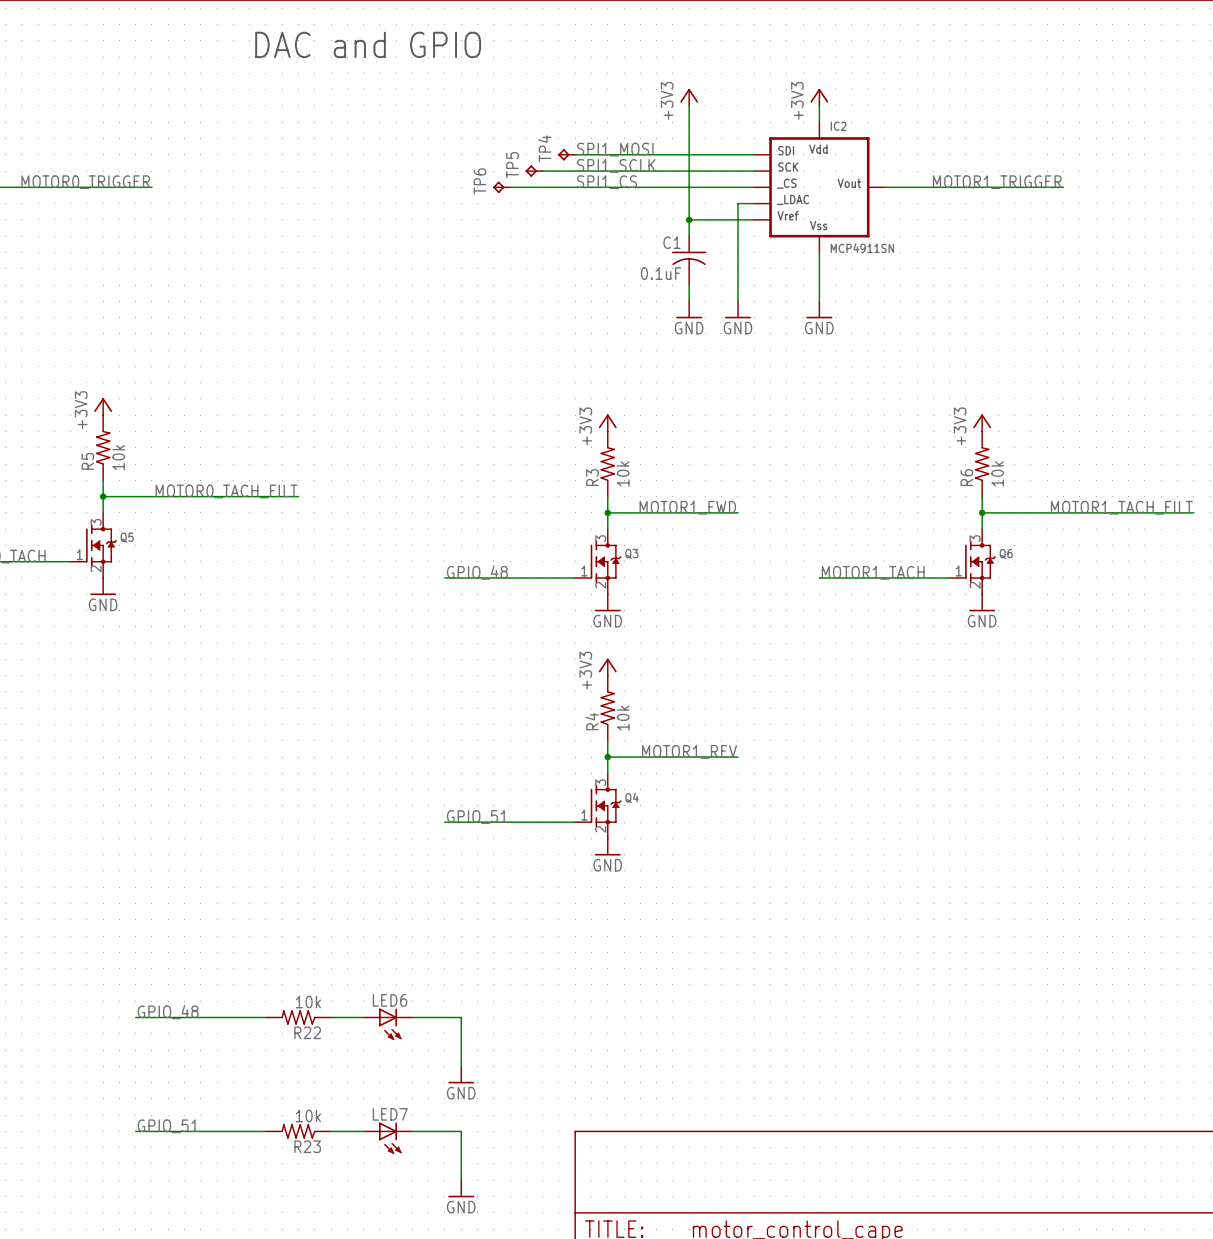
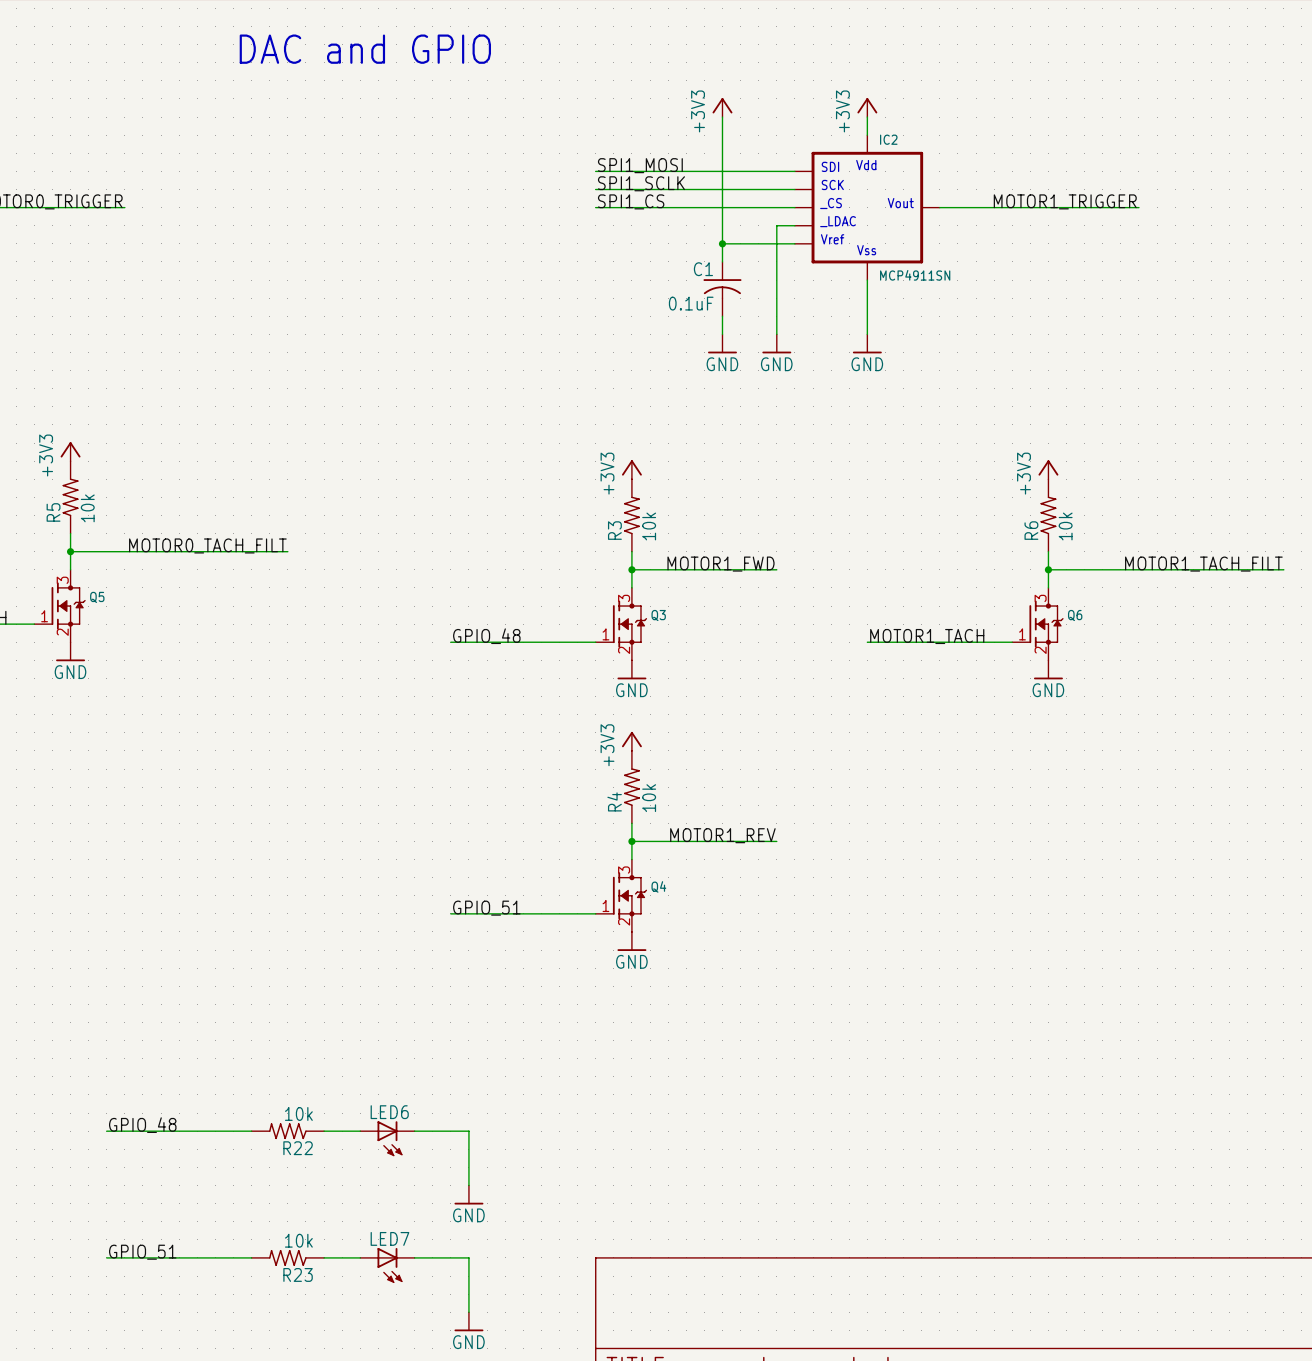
TP4: (566, 154) -> none
TP5: (534, 171) -> none
wire: (542, 171) (575, 171) -> none
TP6: (501, 187) -> none
wire: (510, 187) (575, 187) -> none

